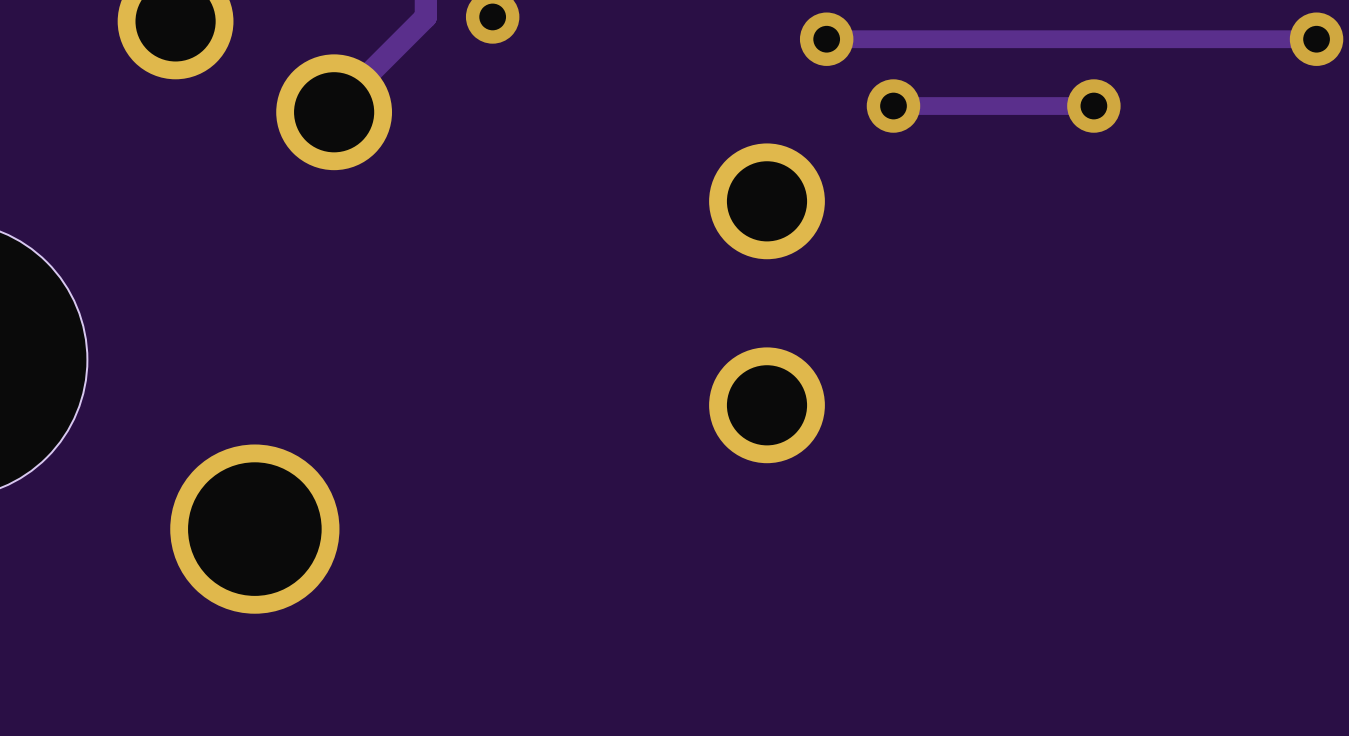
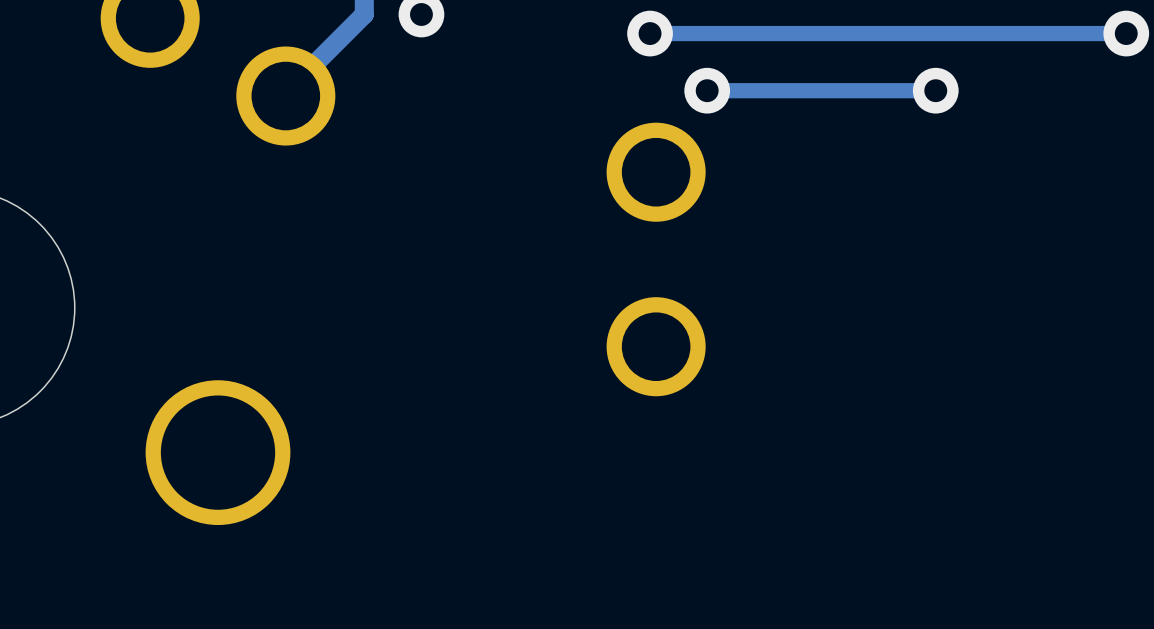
via: none -> (650, 33)
track: none -> (707, 33) (650, 33)
via: (826, 39) -> none
via: none -> (707, 90)
track: none -> (764, 90) (707, 90)
via: (893, 106) -> none

